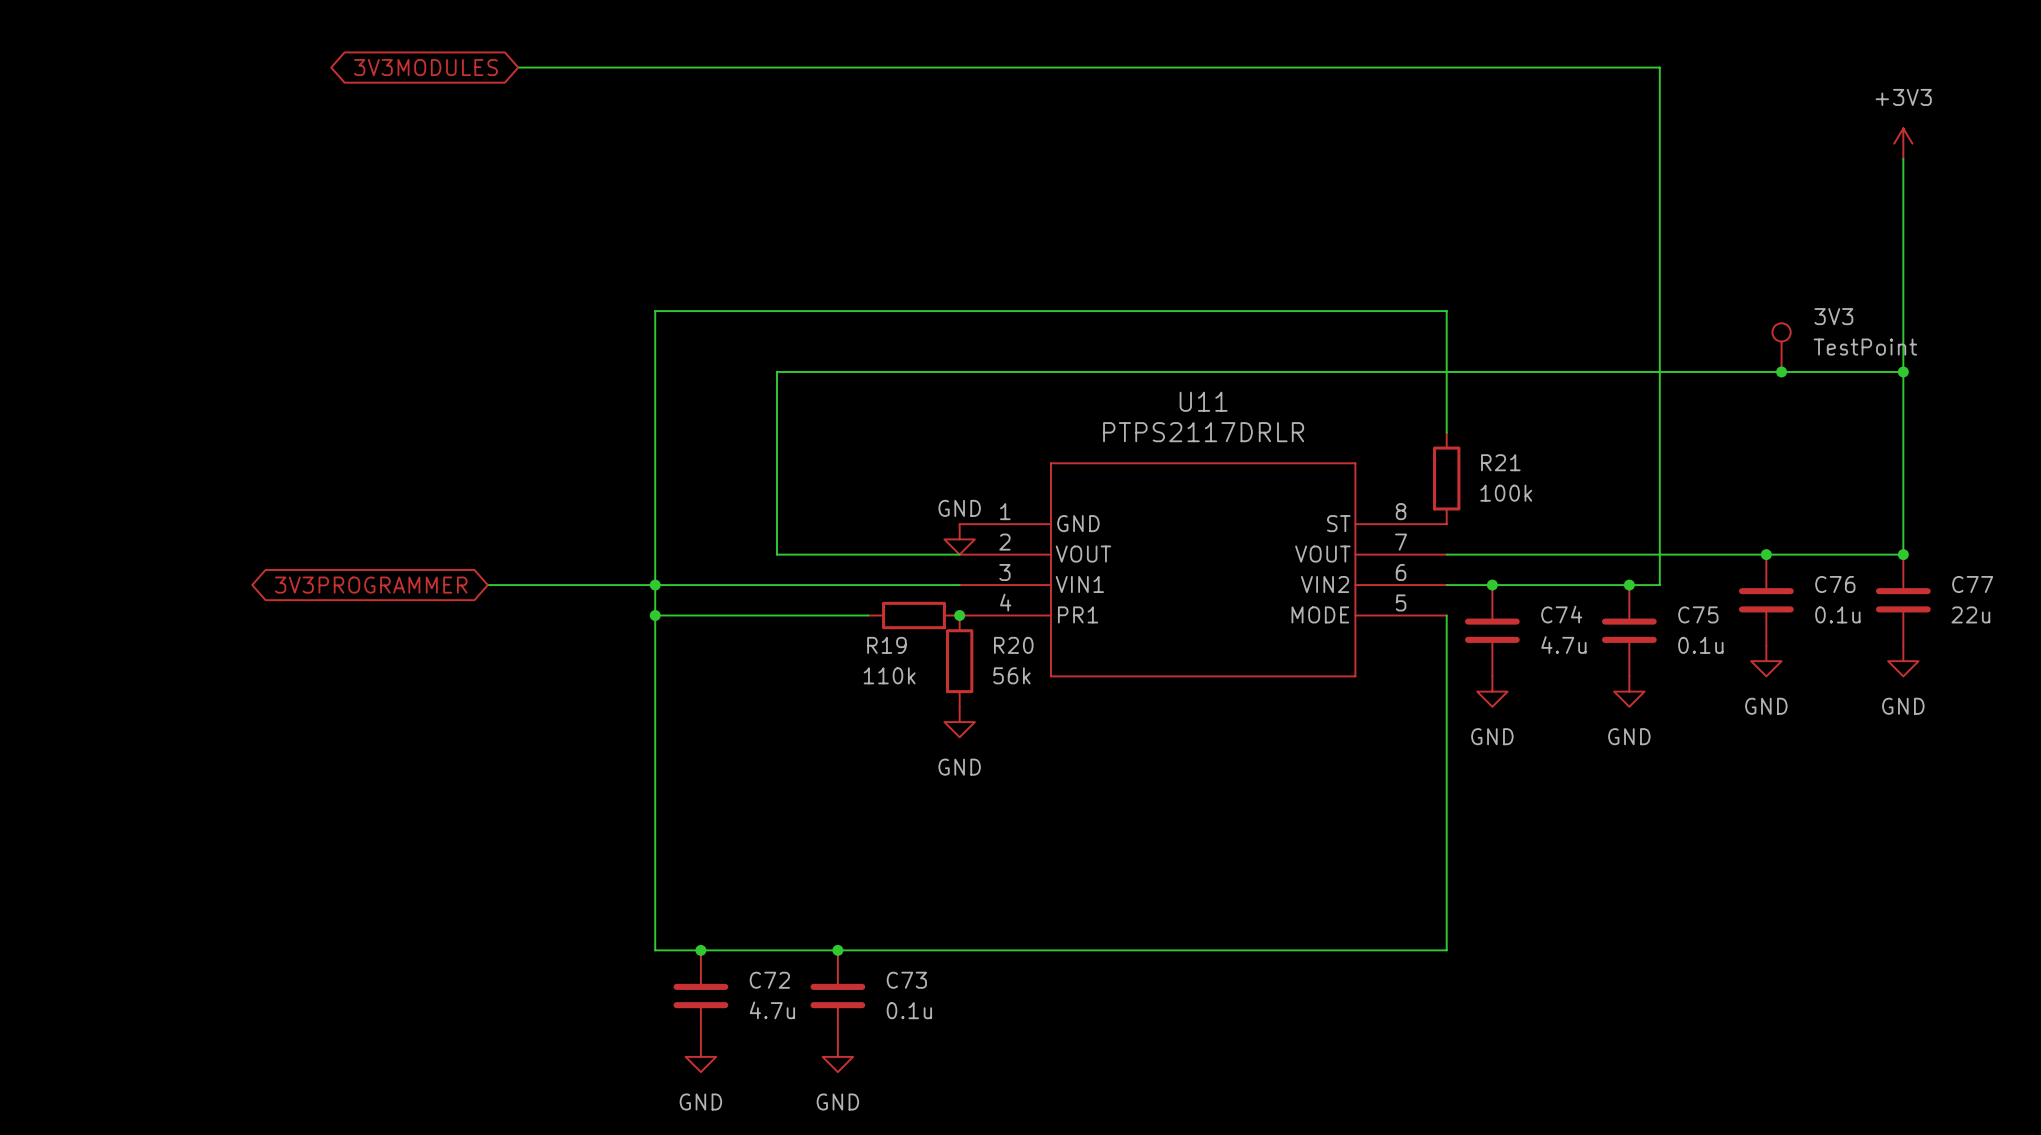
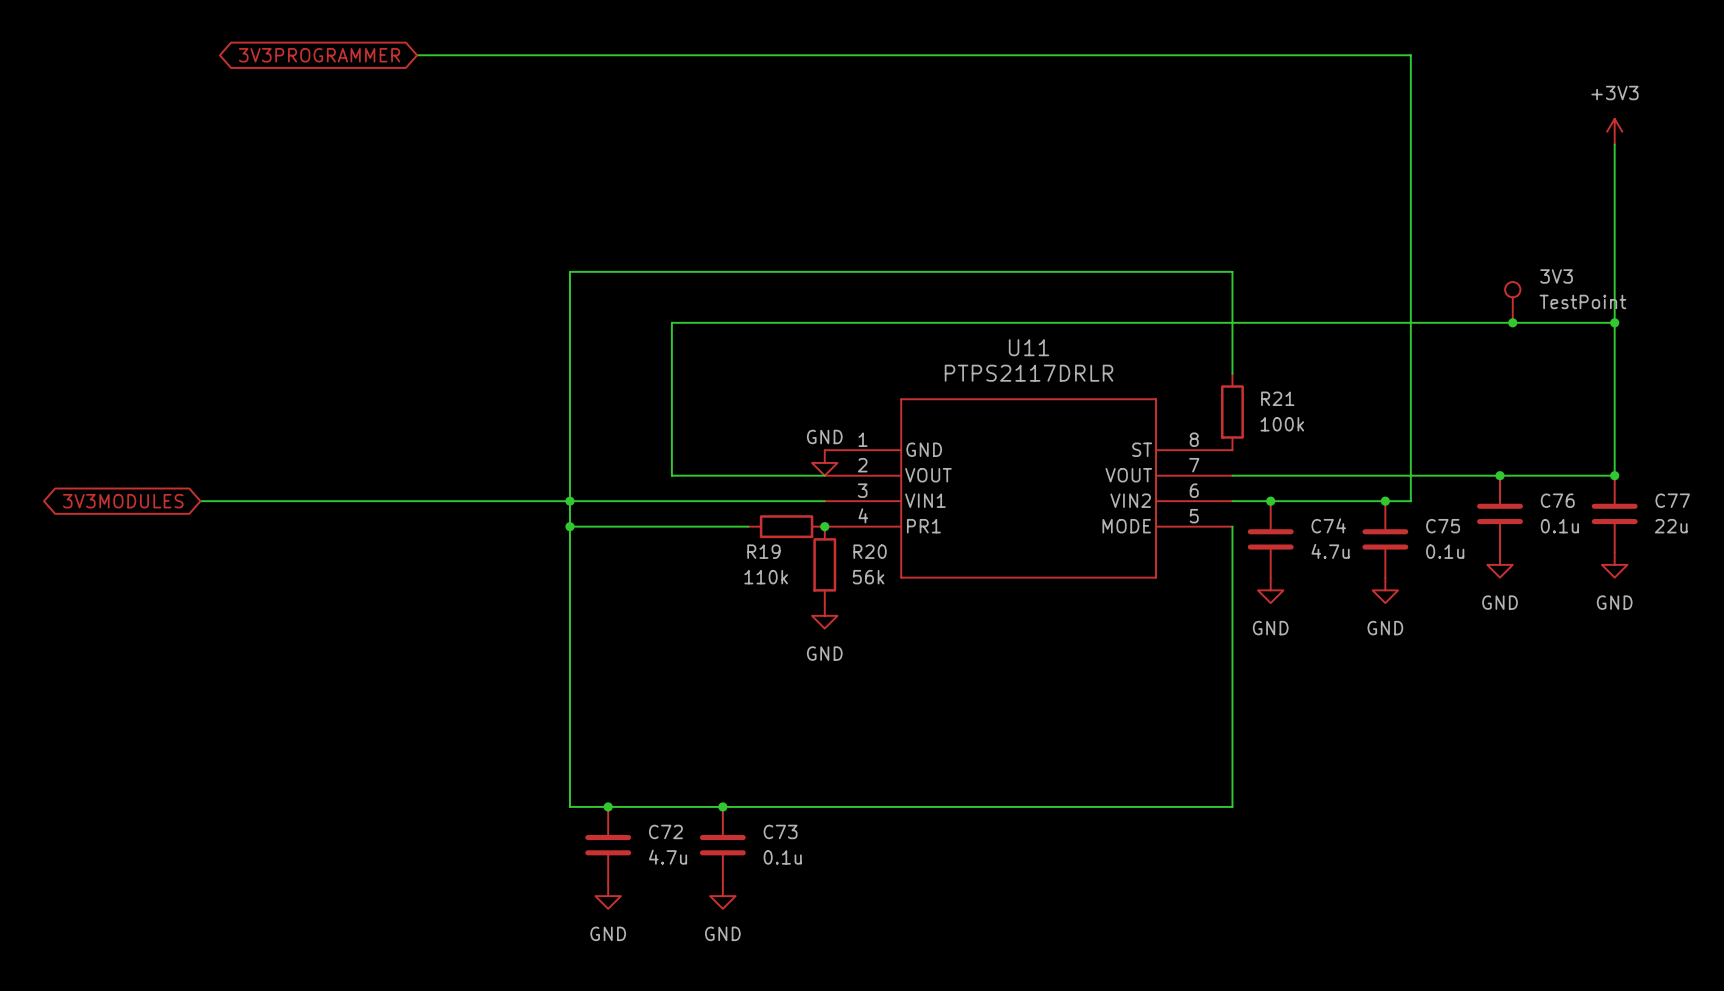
global label: none -> 3V3PROGRAMMER (319, 55)
global label: 3V3MODULES (425, 67) -> none
wire: (518, 67) (1659, 67) -> (417, 55) (1410, 55) (1410, 68)
global label: none -> 3V3MODULES (123, 501)
wire: none -> (200, 501) (429, 501)
global label: 3V3PROGRAMMER (371, 585) -> none

